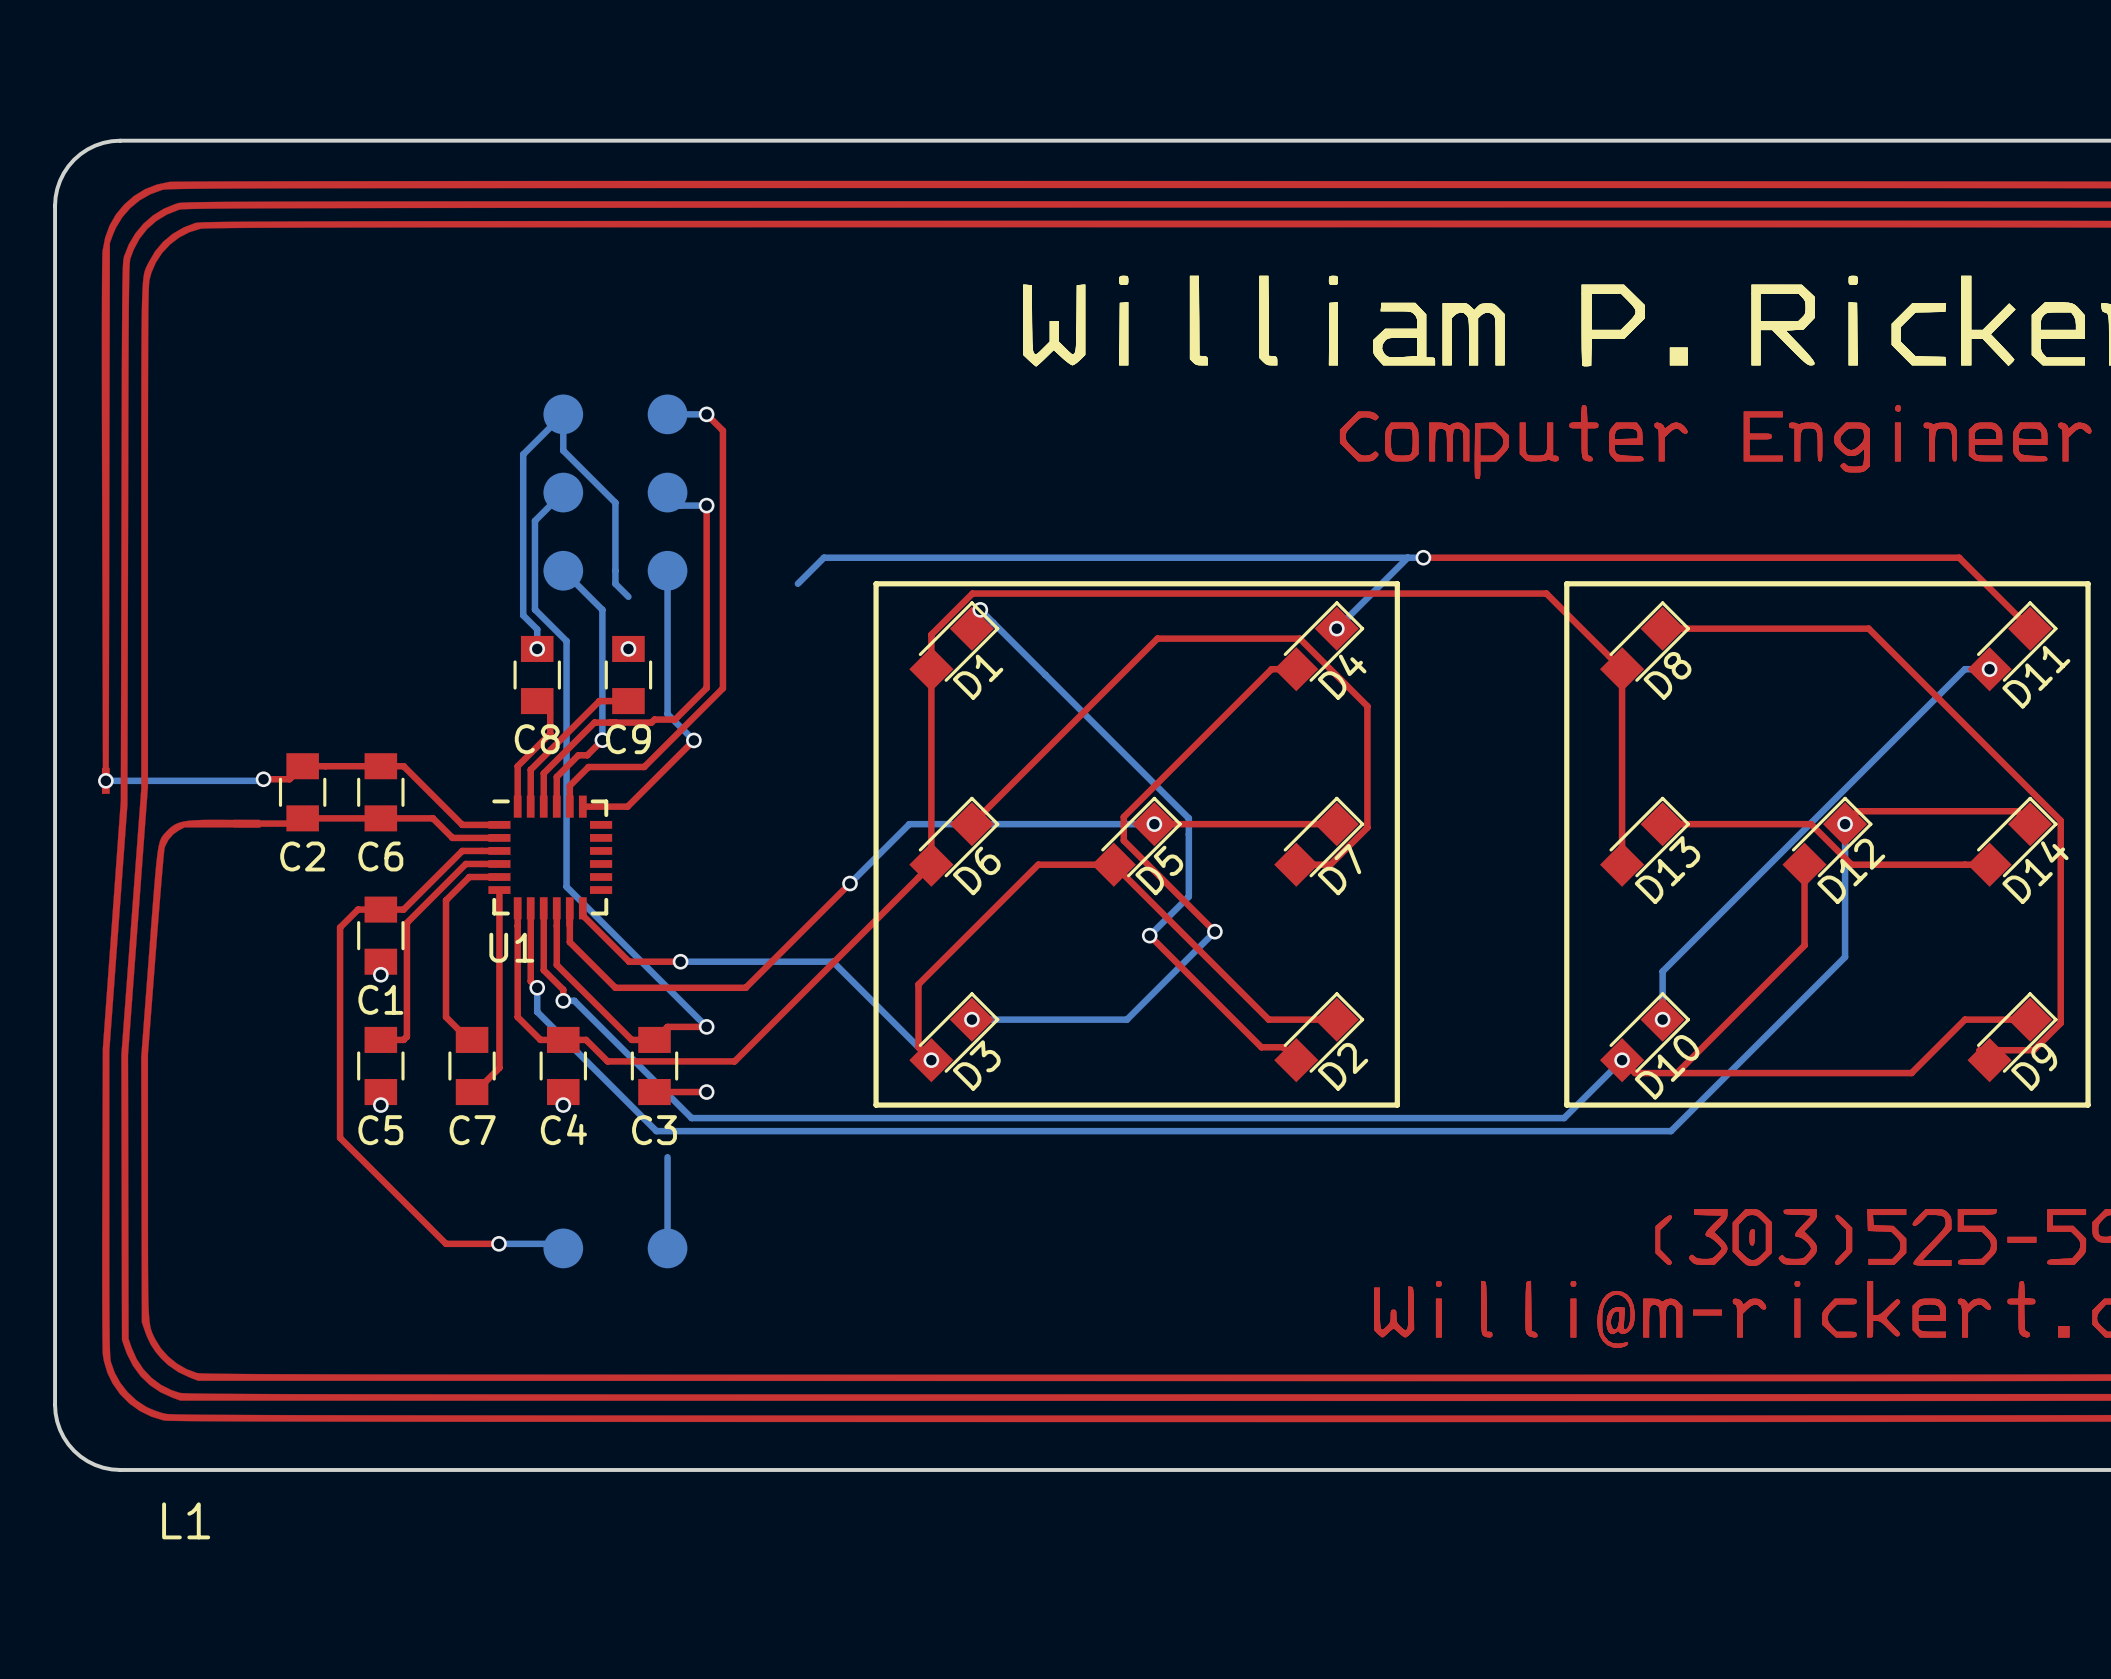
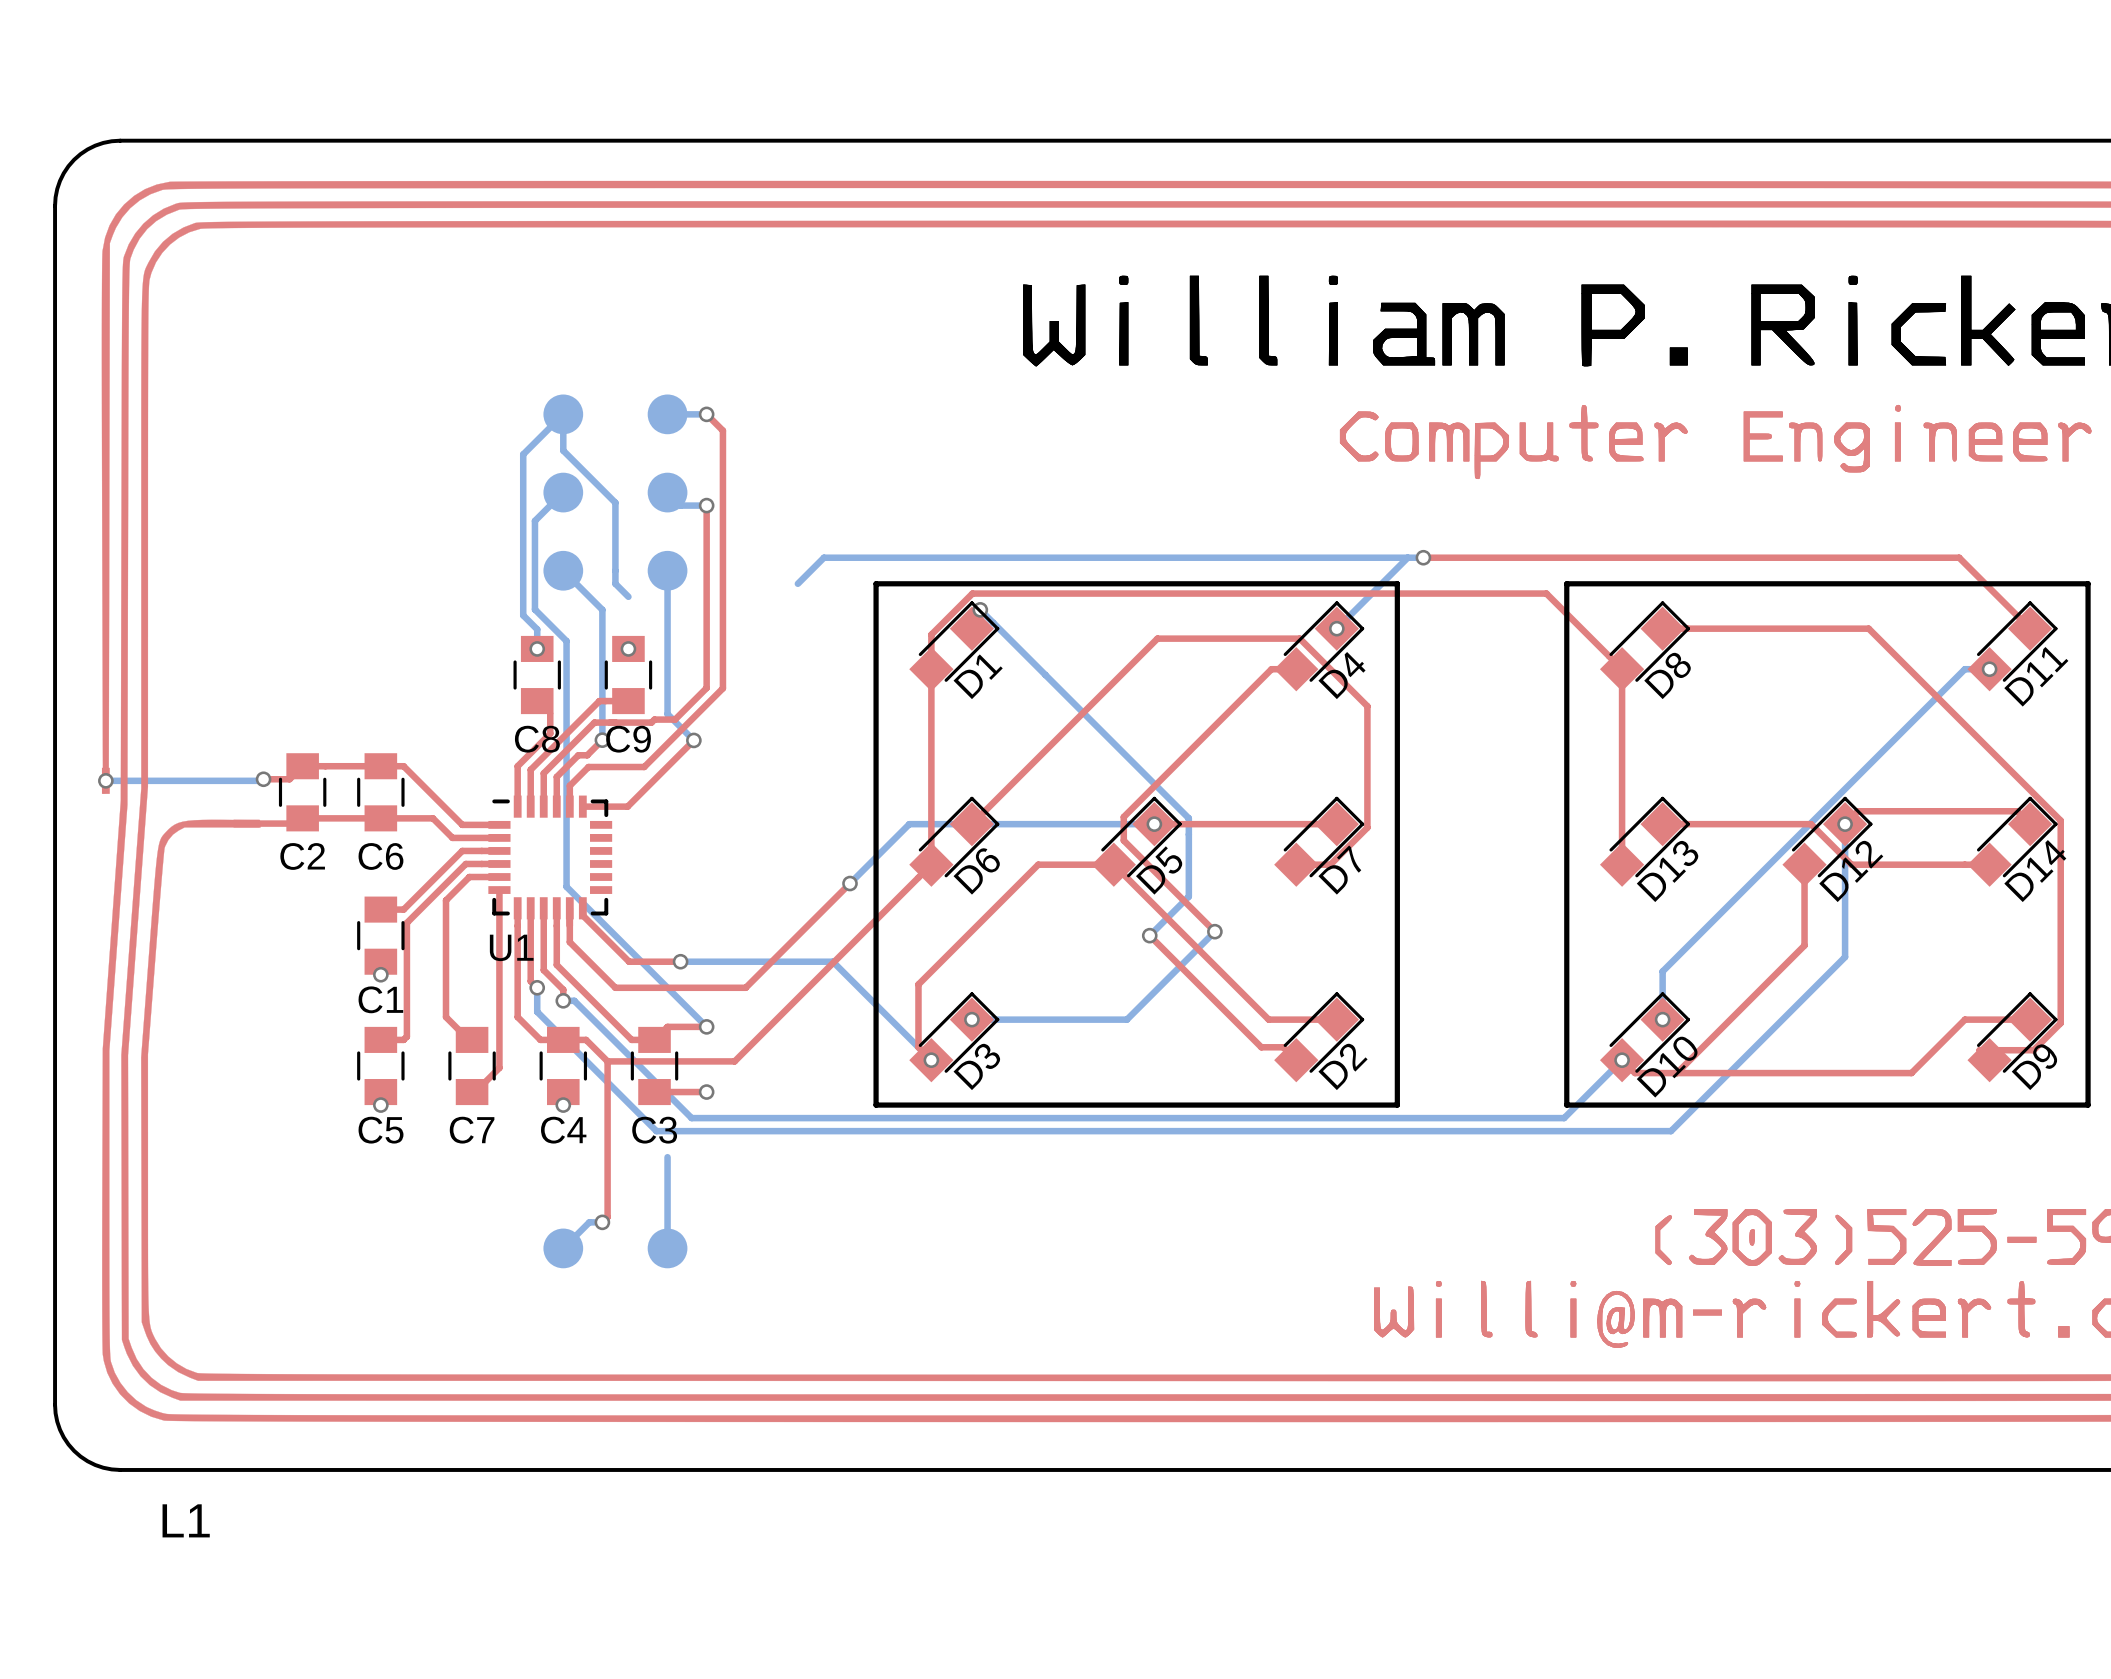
top track: (380, 909) (358, 909) (340, 927) (340, 1137) (446, 1243) (498, 1243) -> none
top track: none -> (607, 1061) (607, 1217) (602, 1222)
bottom track: (498, 1243) (558, 1243) (563, 1248) -> (602, 1222) (589, 1222) (563, 1248)
via position: (498, 1243) -> (602, 1222)

